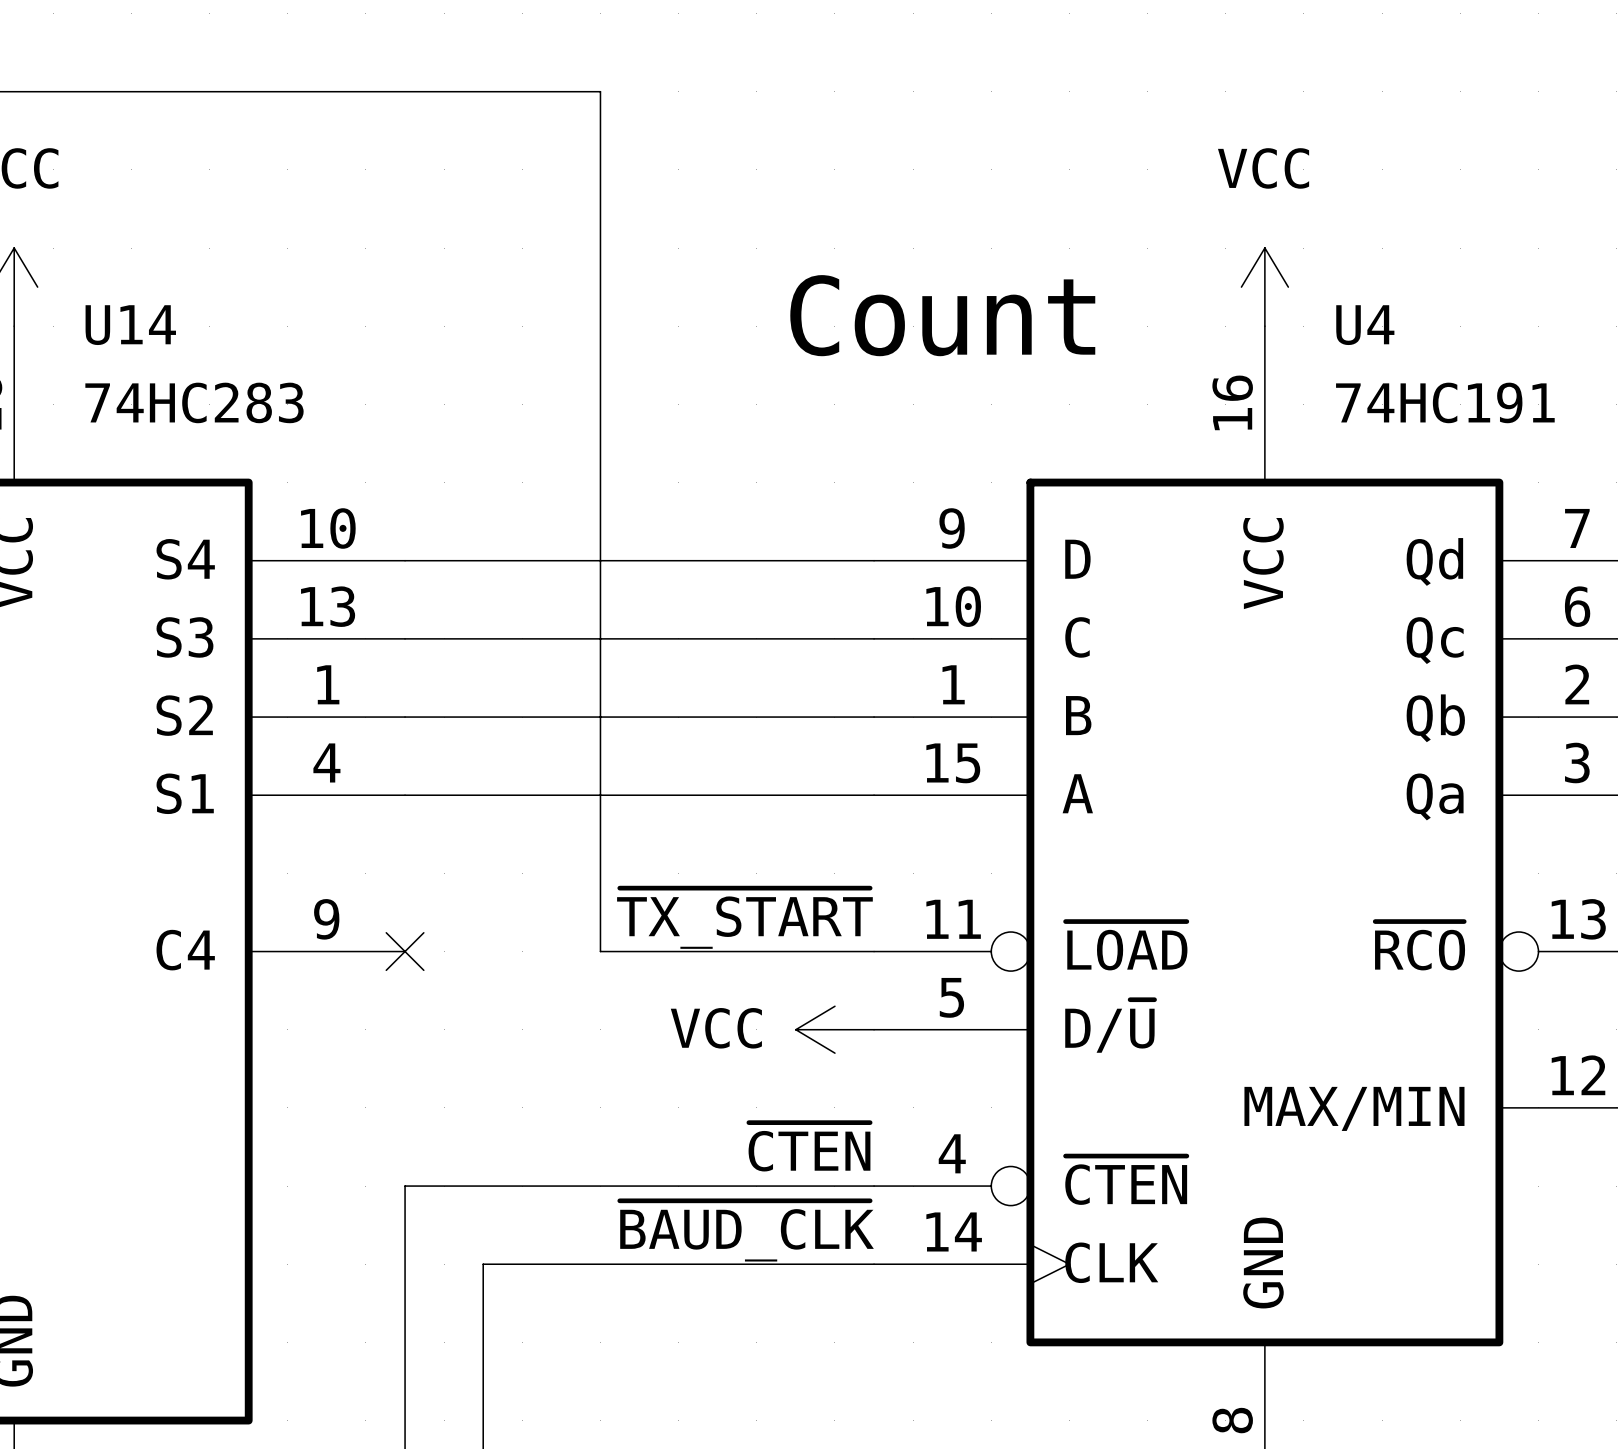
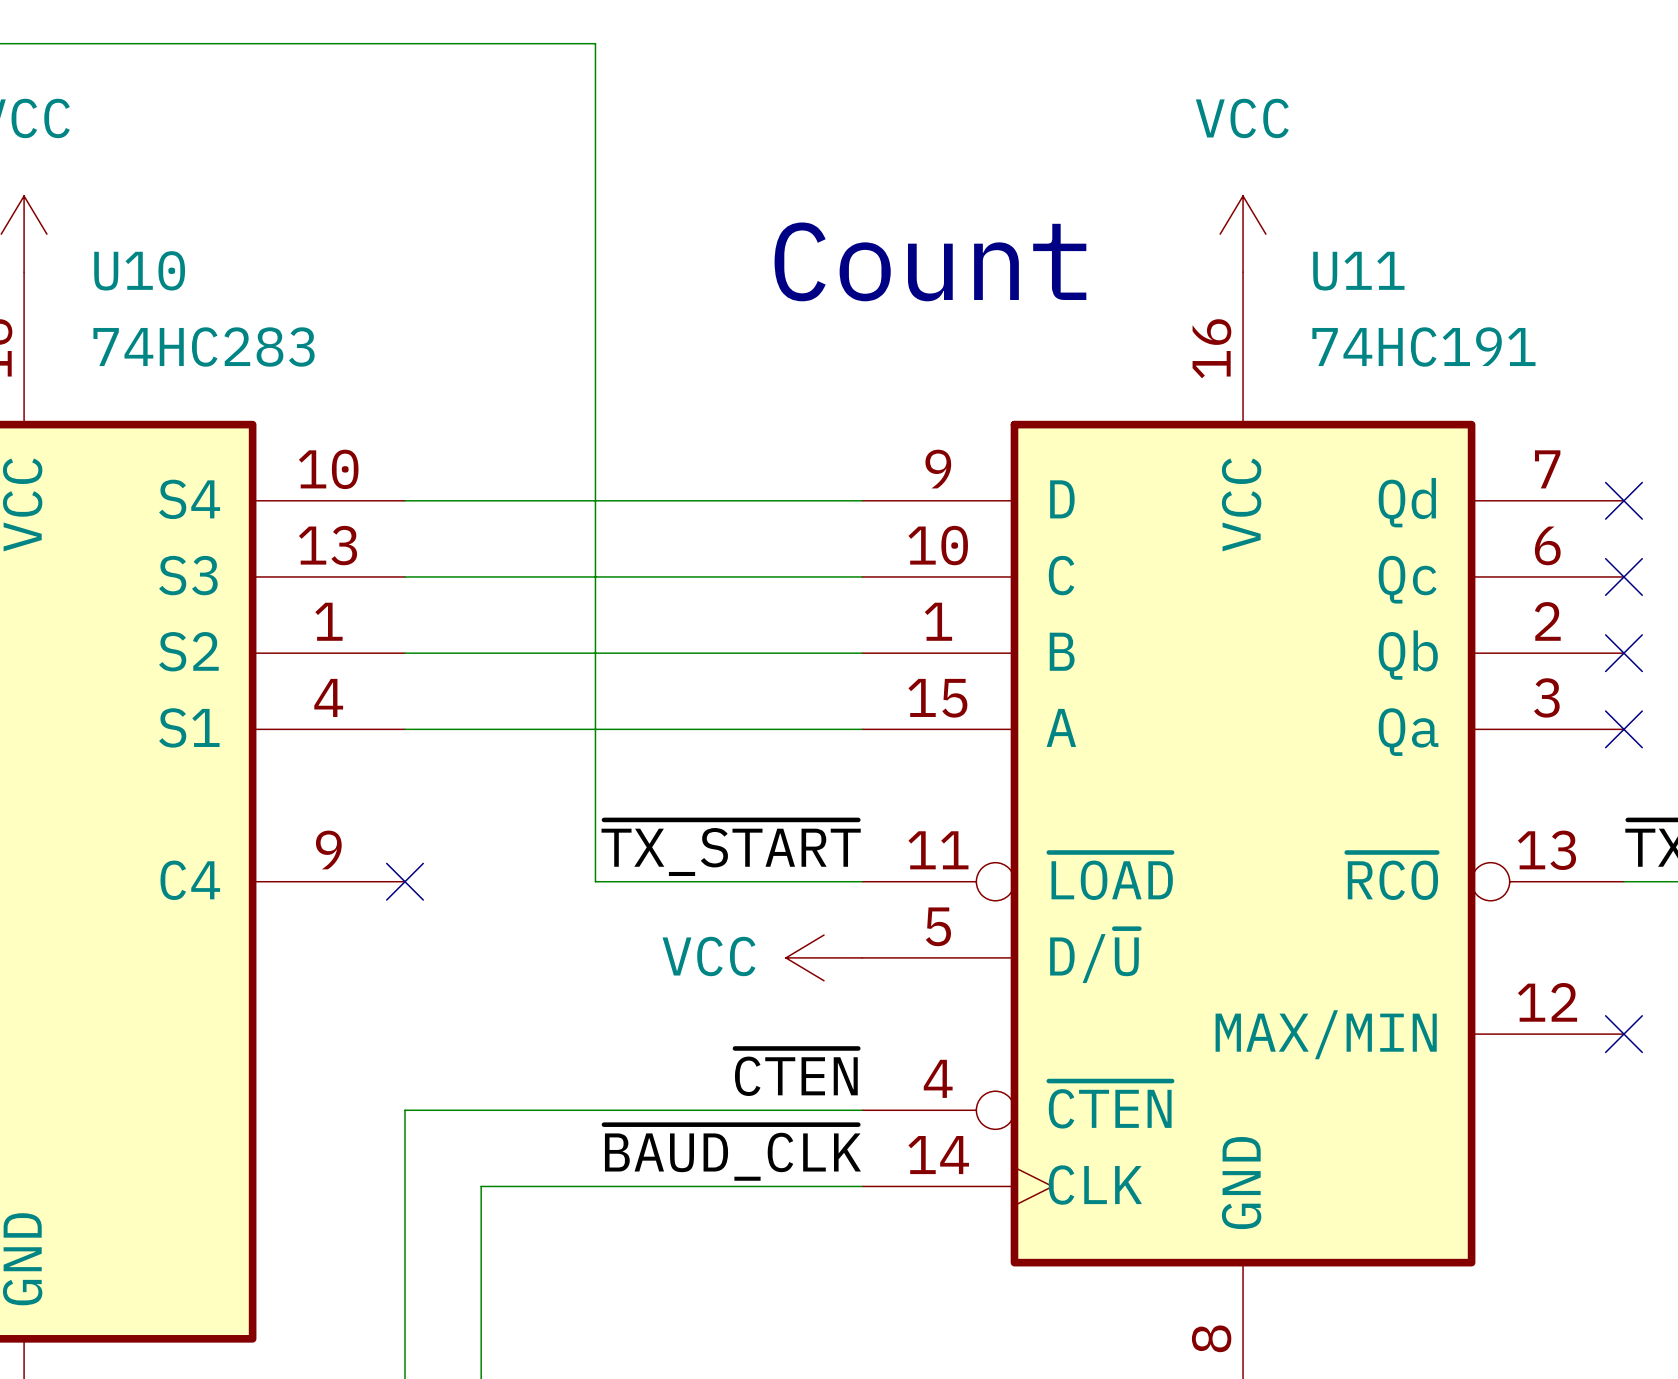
U14 name: U14 (130, 325) -> U10 (139, 270)
U4 name: U4 (1365, 325) -> U11 (1358, 271)

